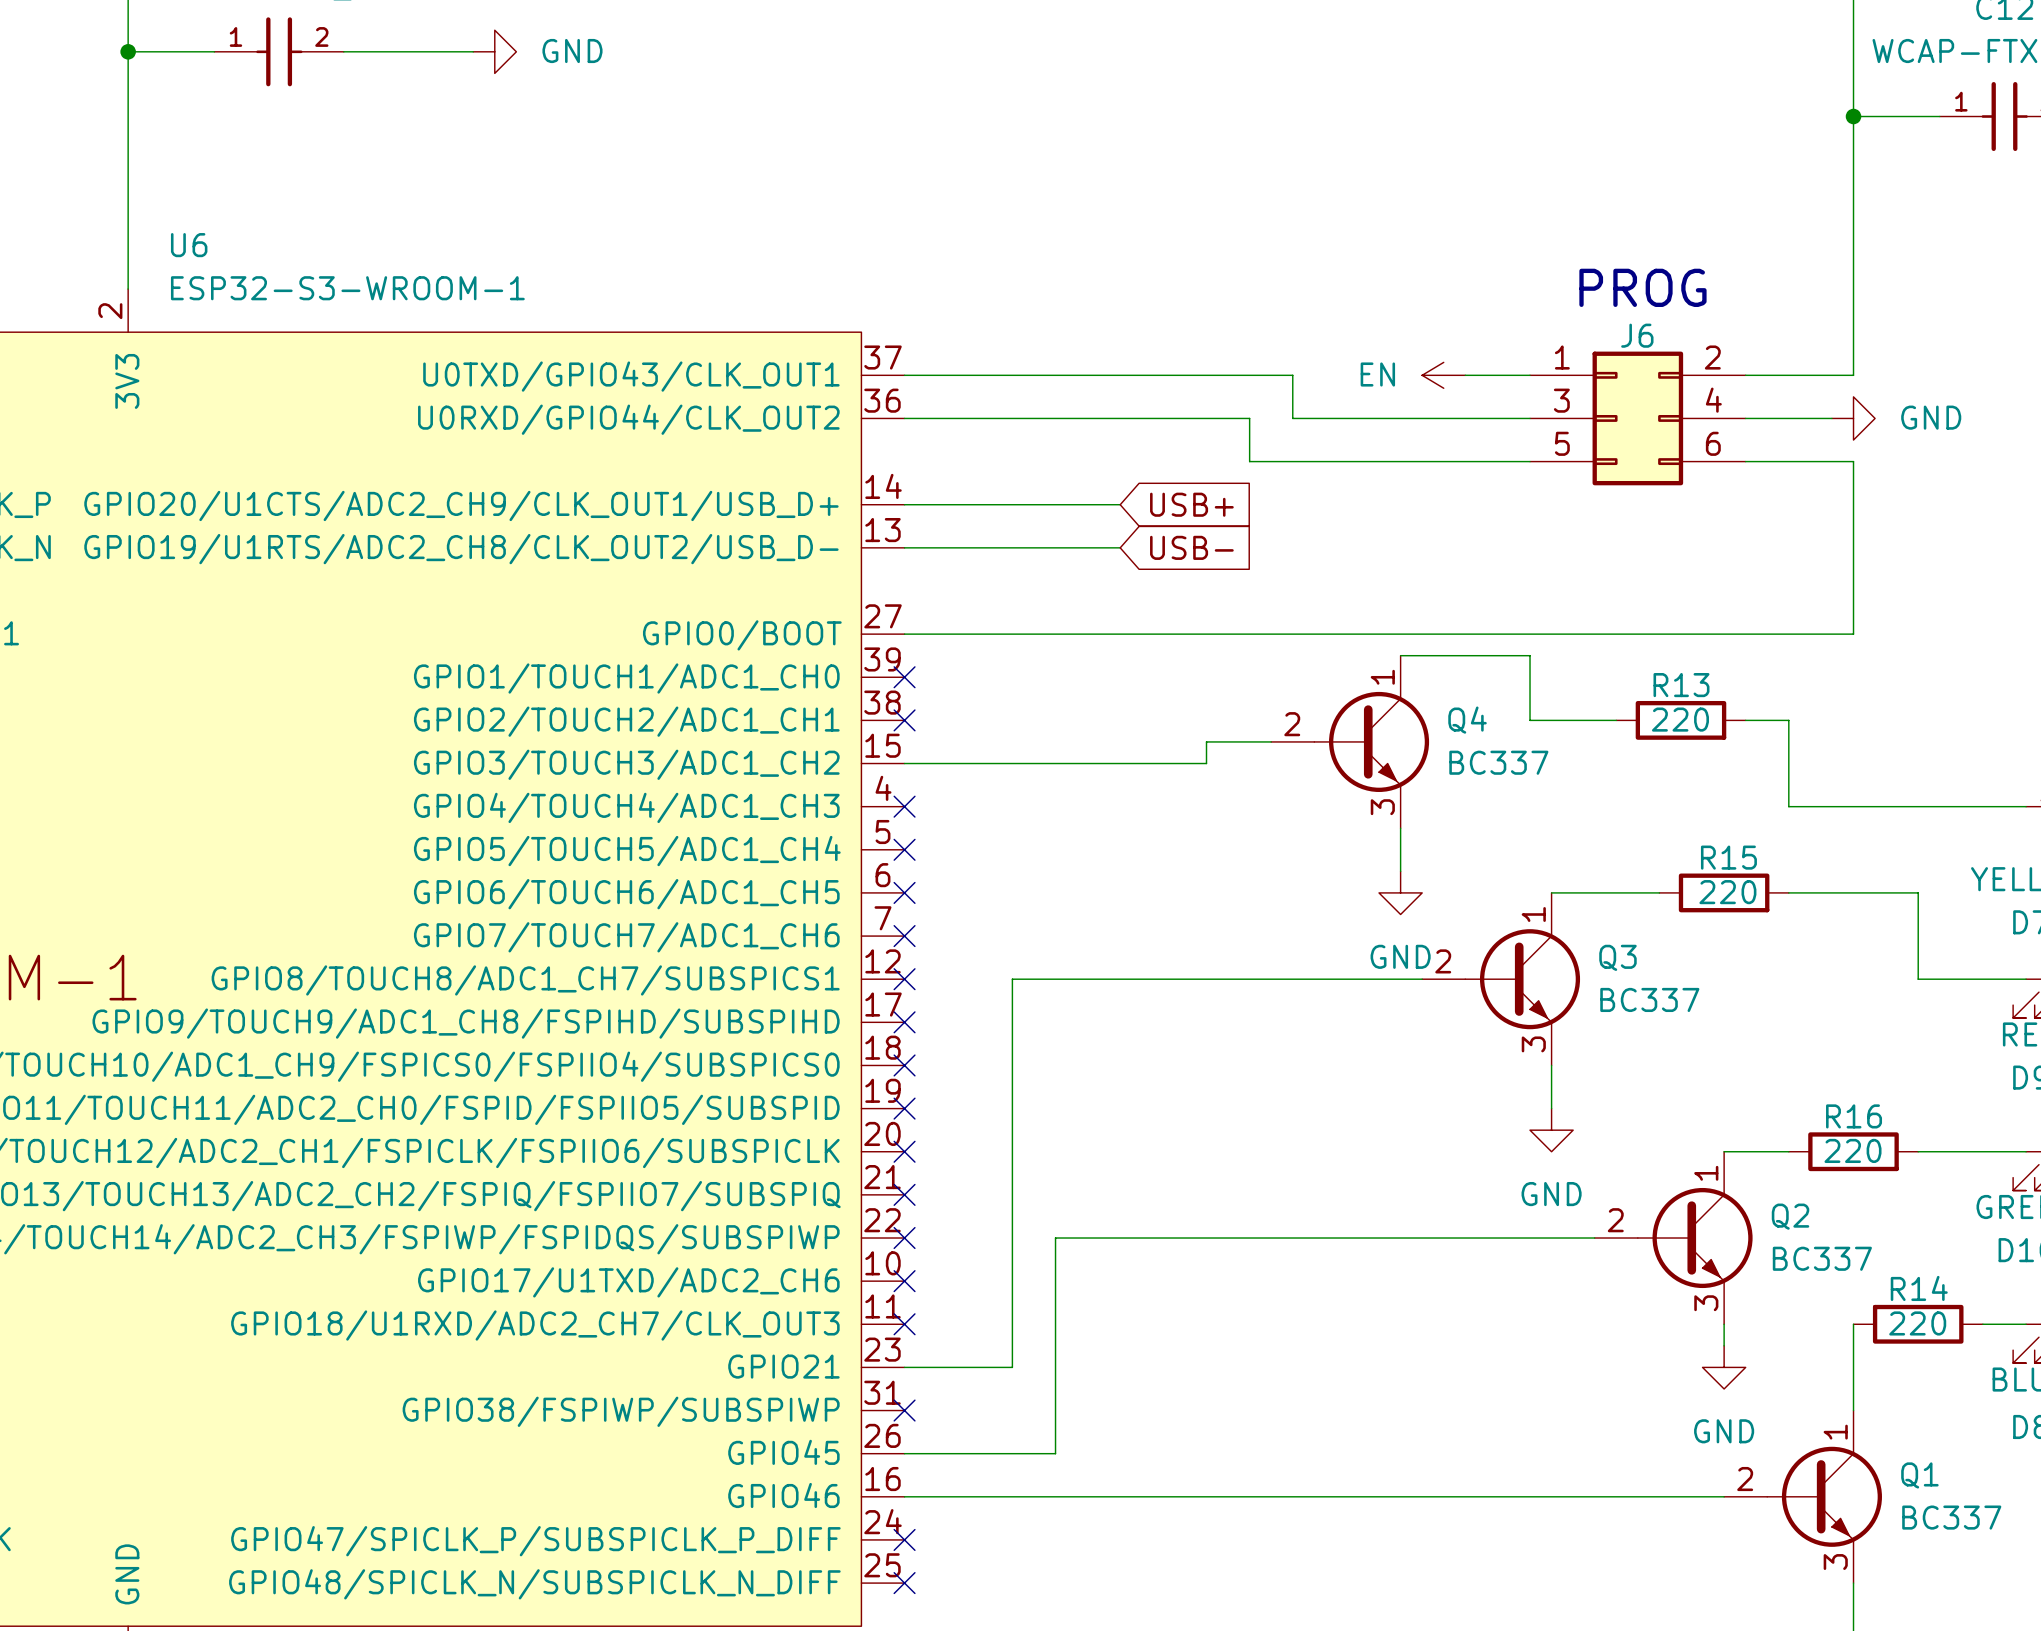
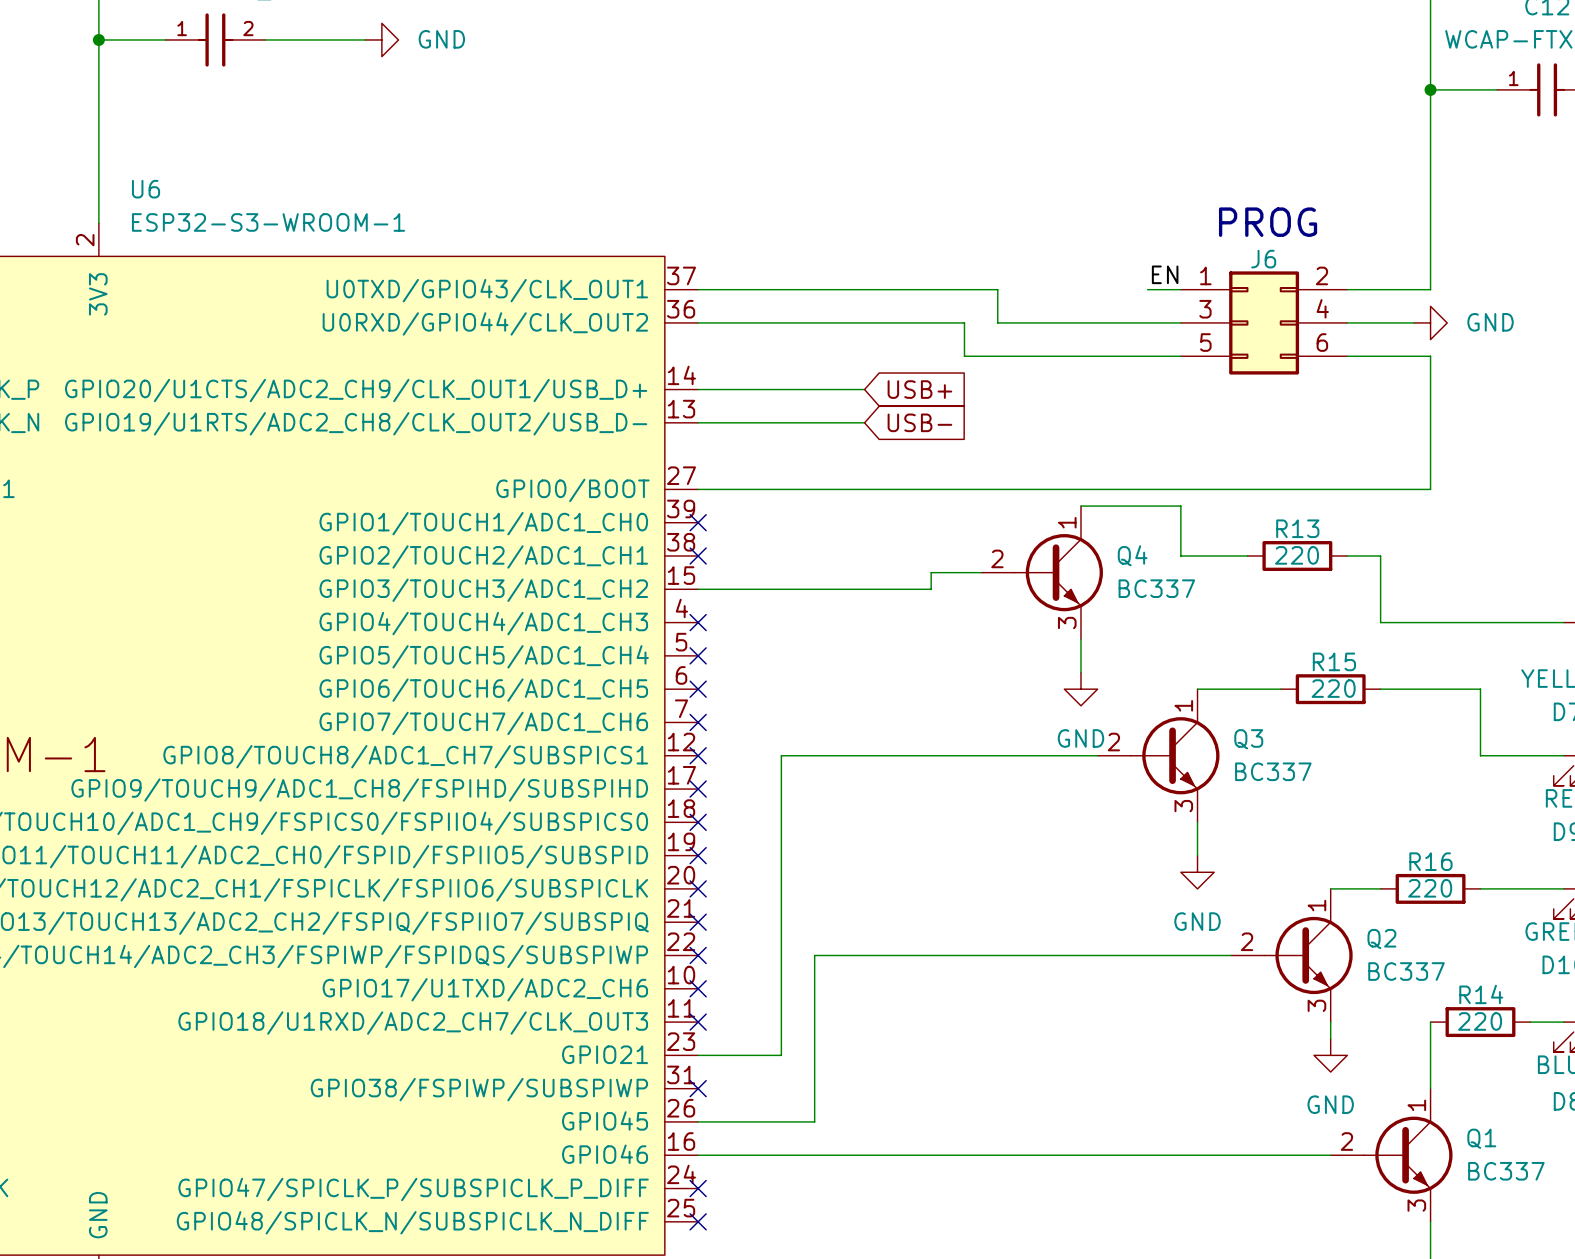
label: none -> EN (1165, 274)
power symbol: EN (1443, 375) -> none
wire: (1465, 375) (1486, 375) -> none

